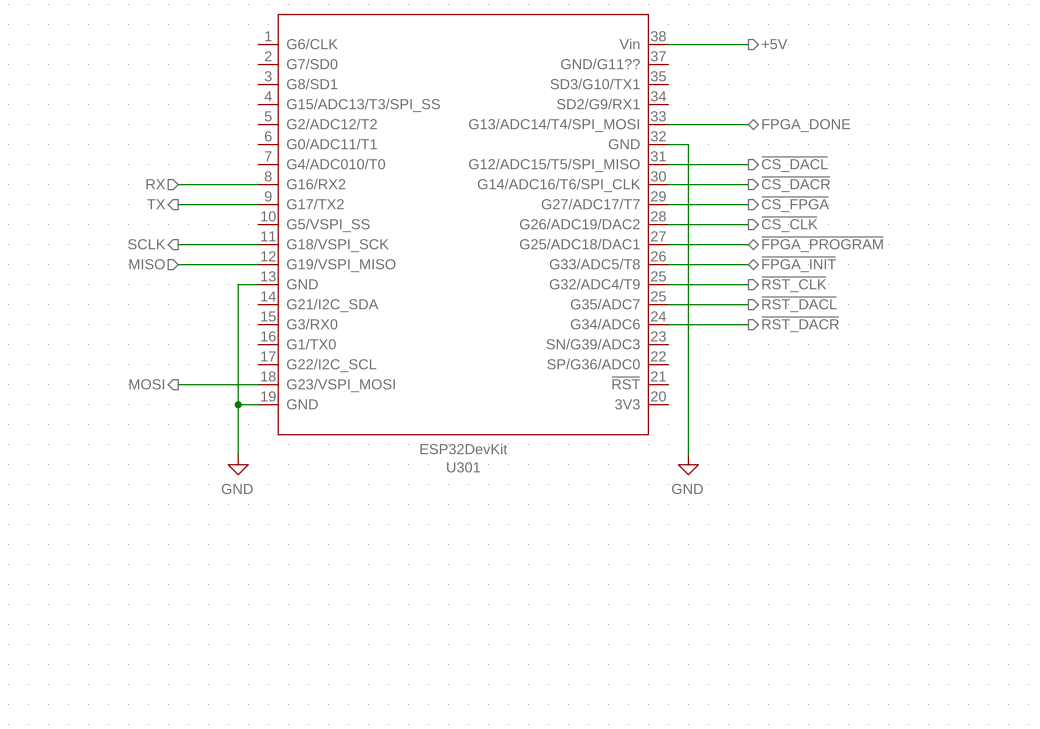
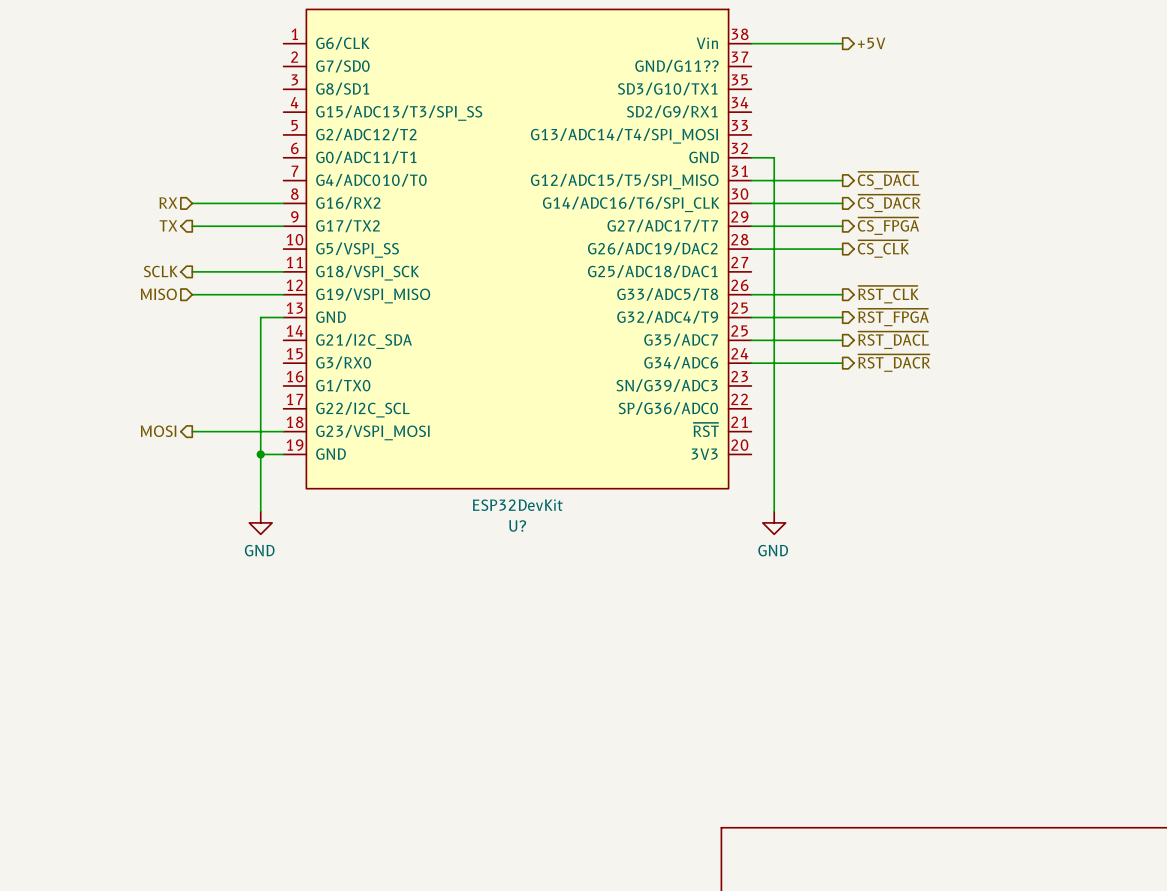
wire: (668, 124) (748, 124) -> none
hierarchical label: FPGA_DONE (806, 125) -> none
wire: (668, 244) (748, 244) -> none
hierarchical label: ~{FPGA_PROGRAM} (822, 244) -> none
hierarchical label shape: bidirectional (799, 264) -> output (888, 294)
hierarchical label: ~{FPGA_INIT} (799, 264) -> ~{RST_CLK} (888, 294)
hierarchical label: ~{RST_CLK} (794, 284) -> ~{RST_FPGA} (893, 317)
U301 name: U301 (463, 467) -> U? (517, 525)

